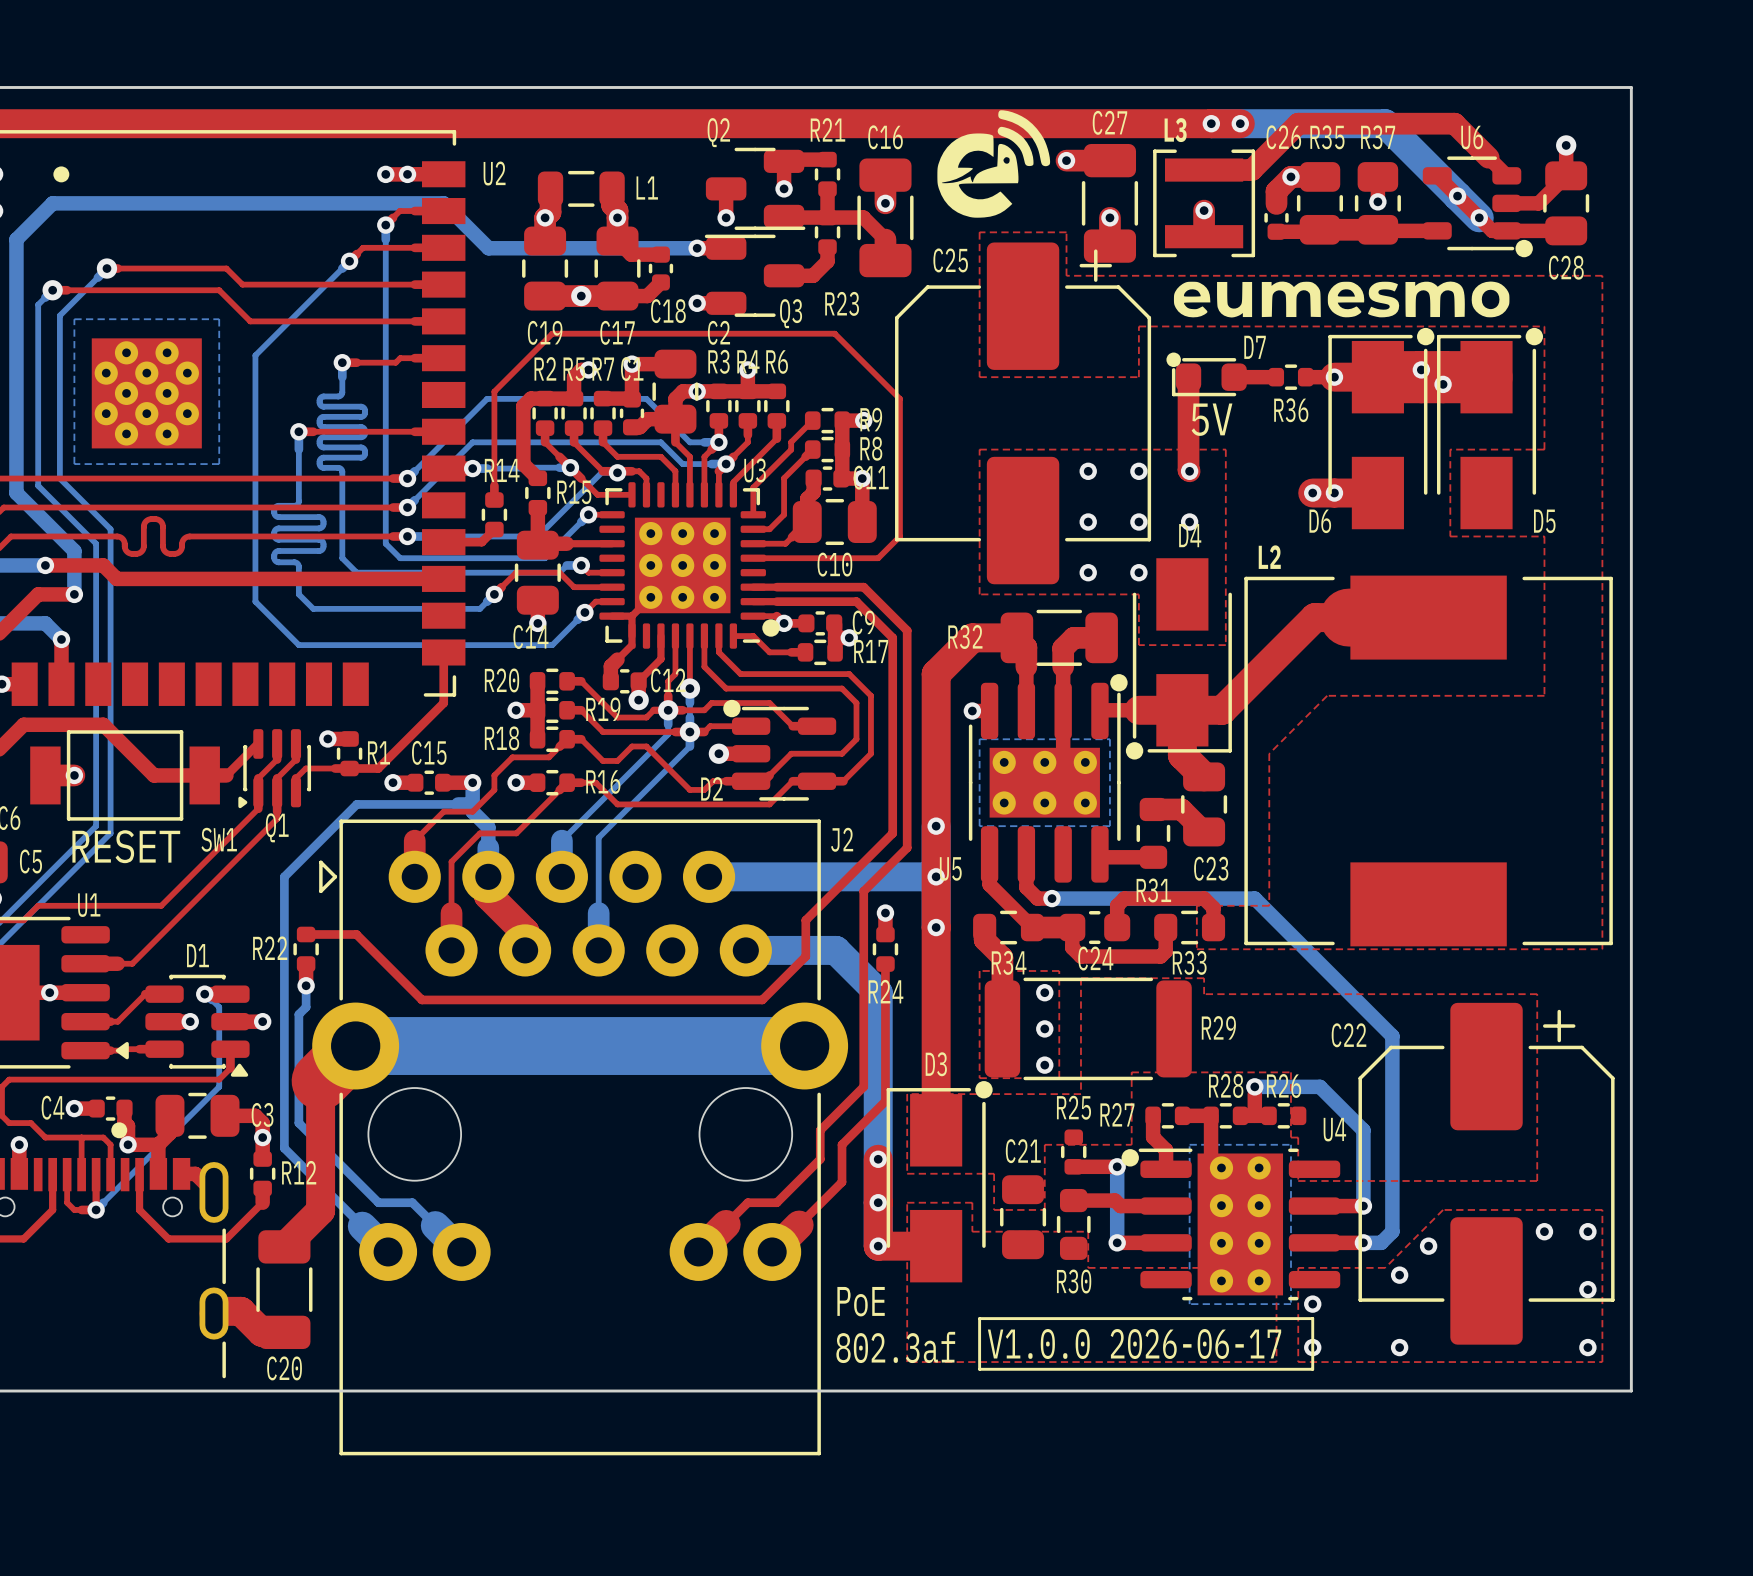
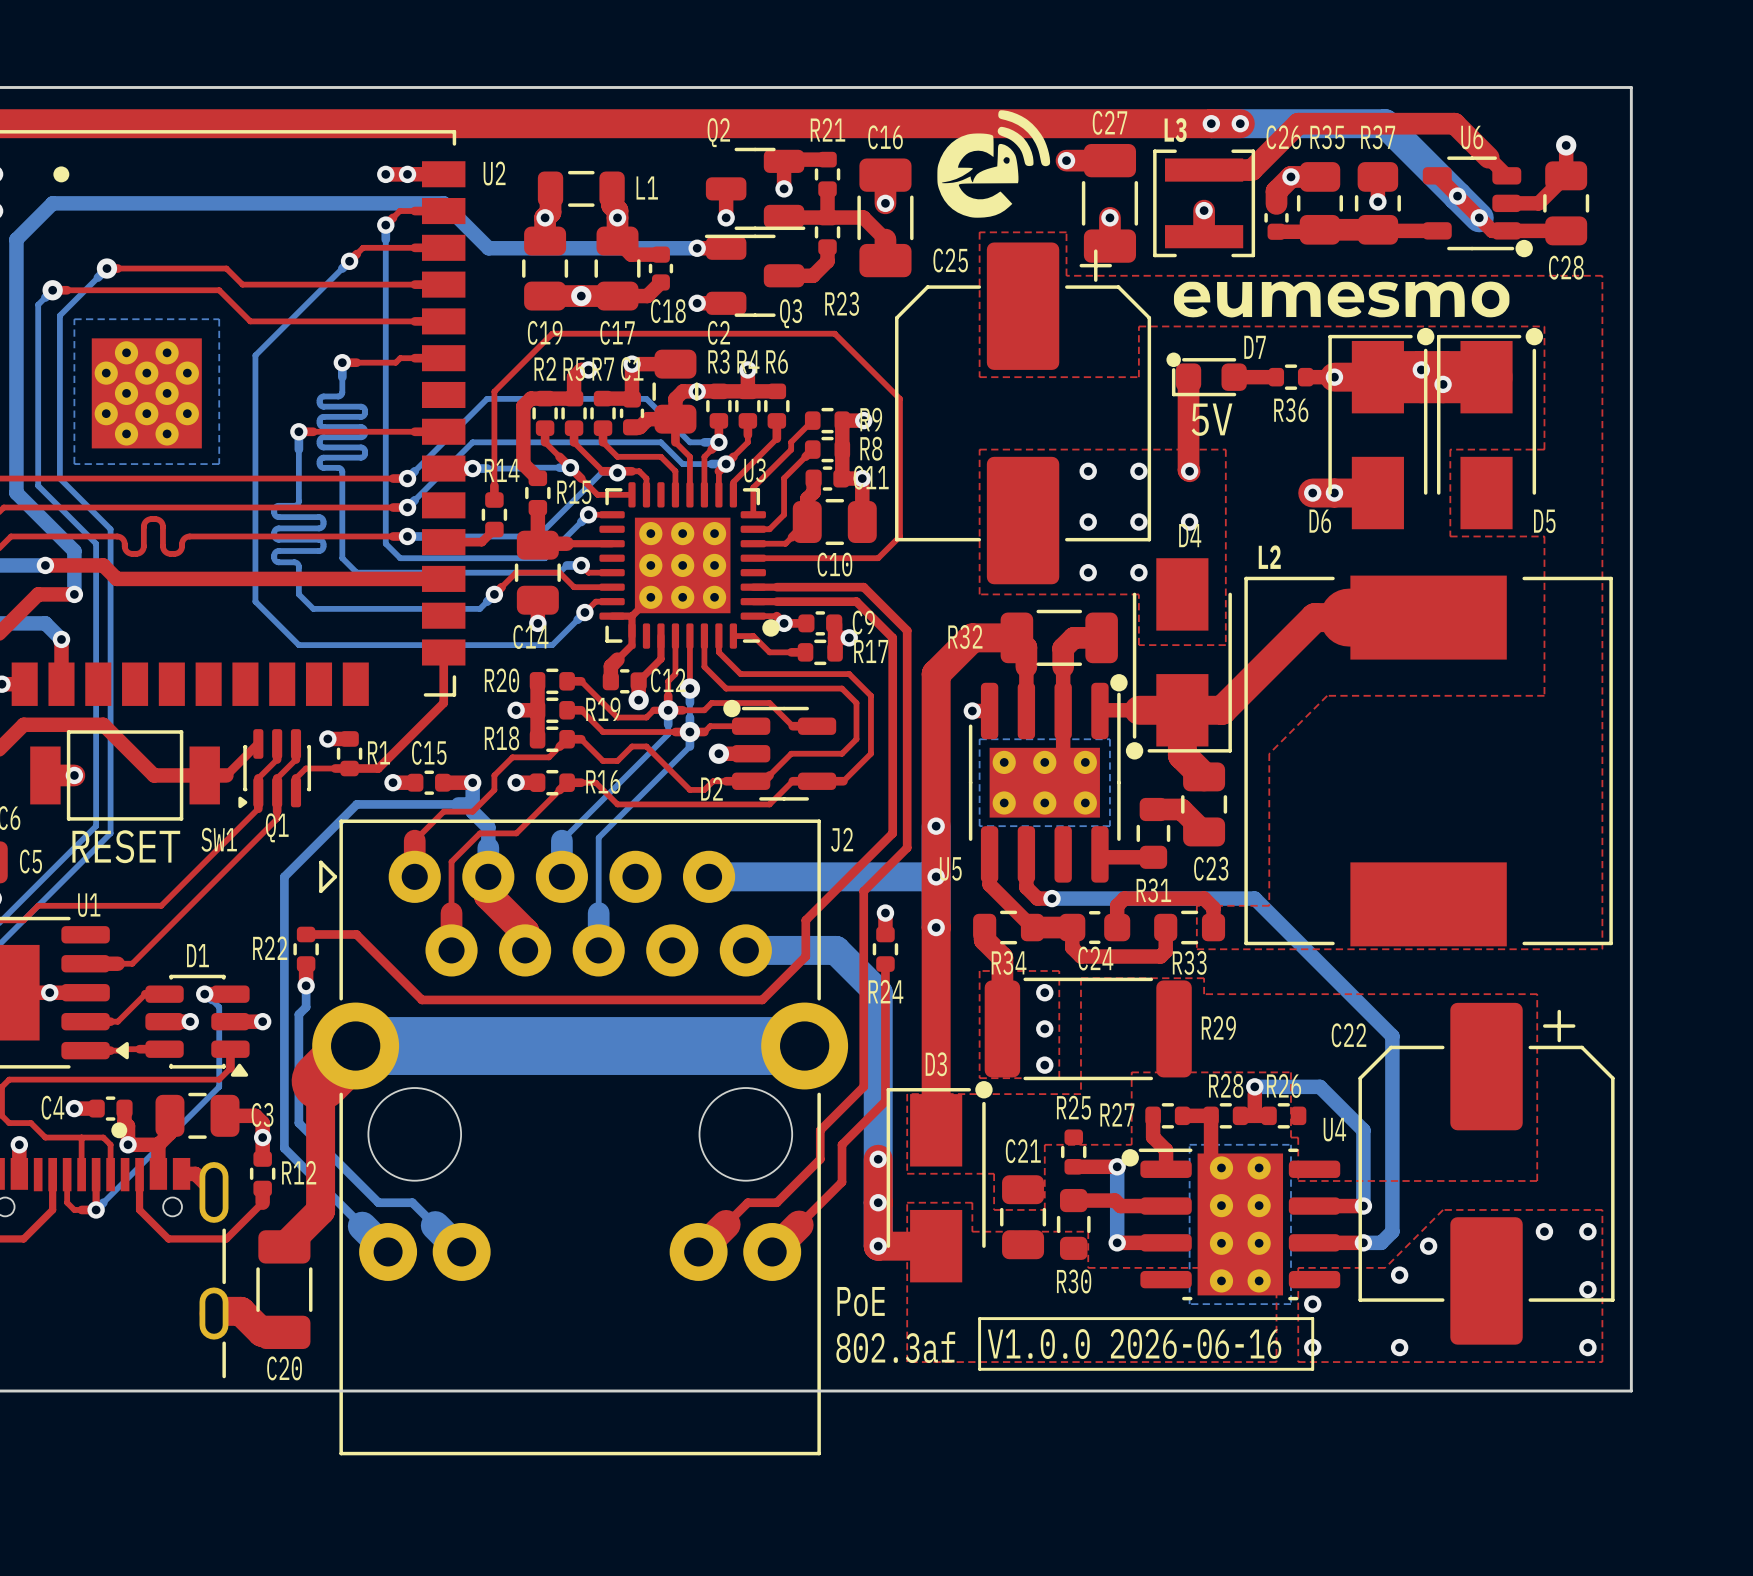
text: V1.0.0 2026-06-17 (1134, 1344) -> V1.0.0 2026-06-16 (1134, 1344)

